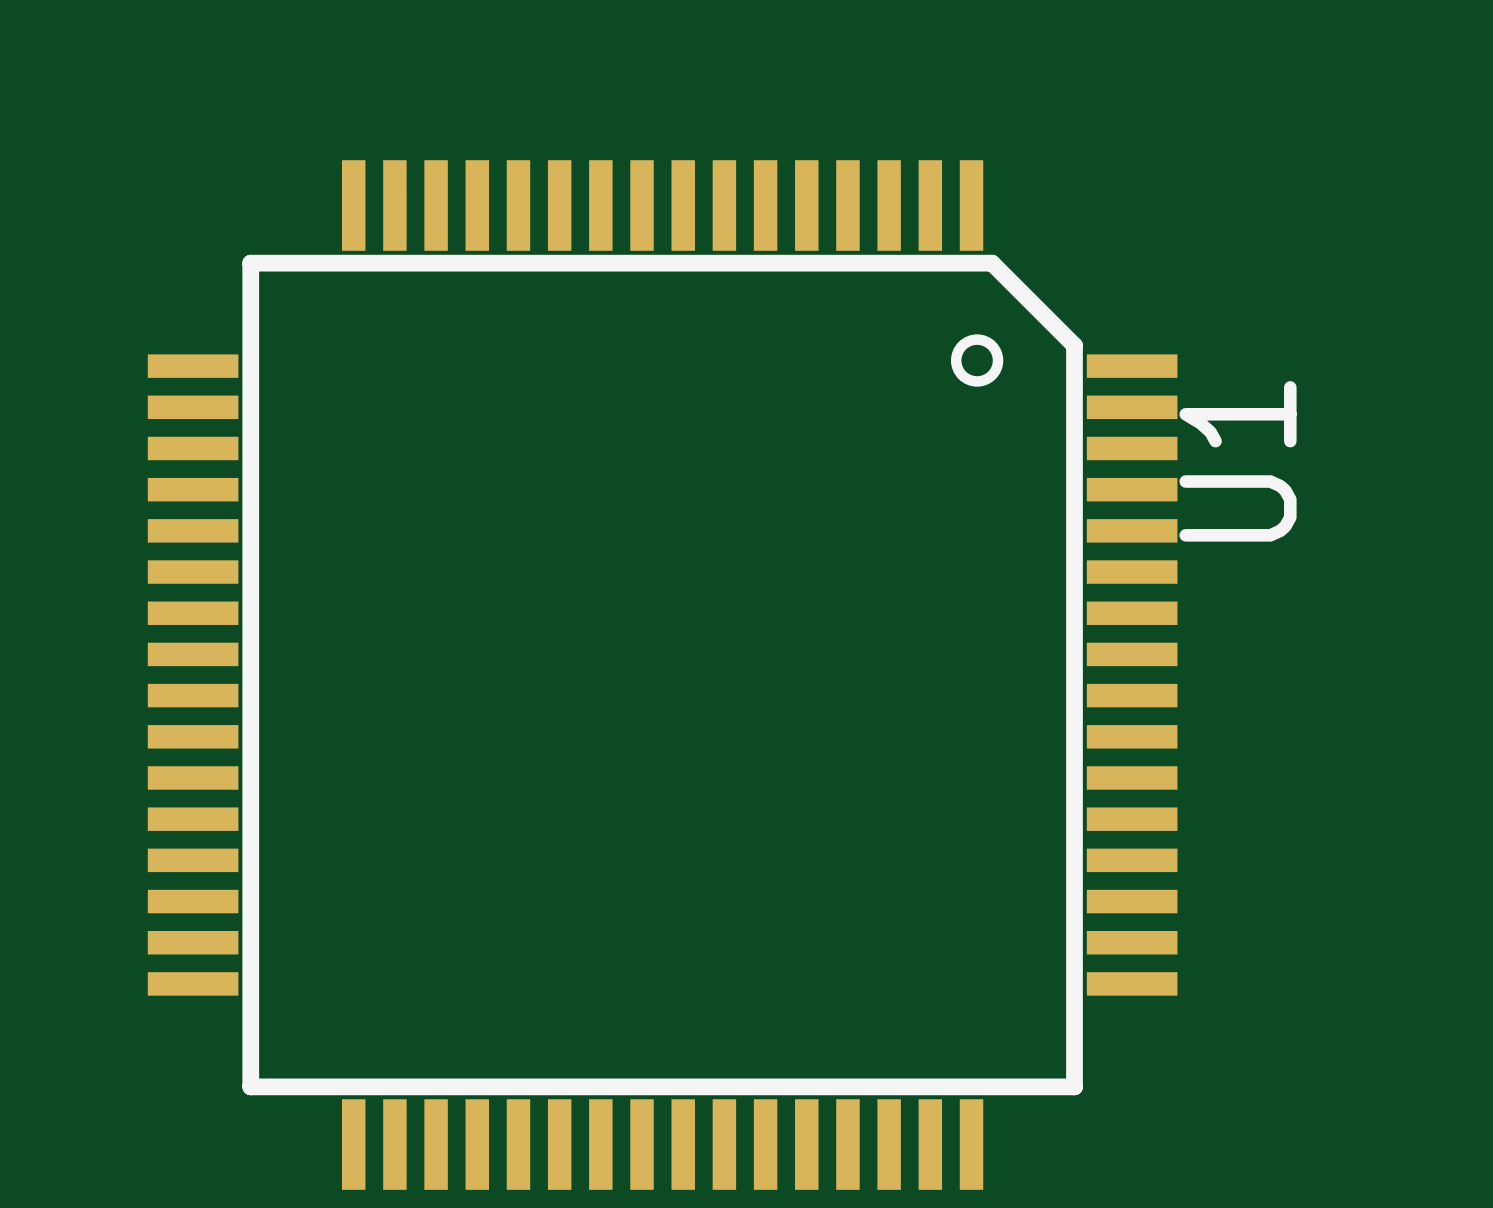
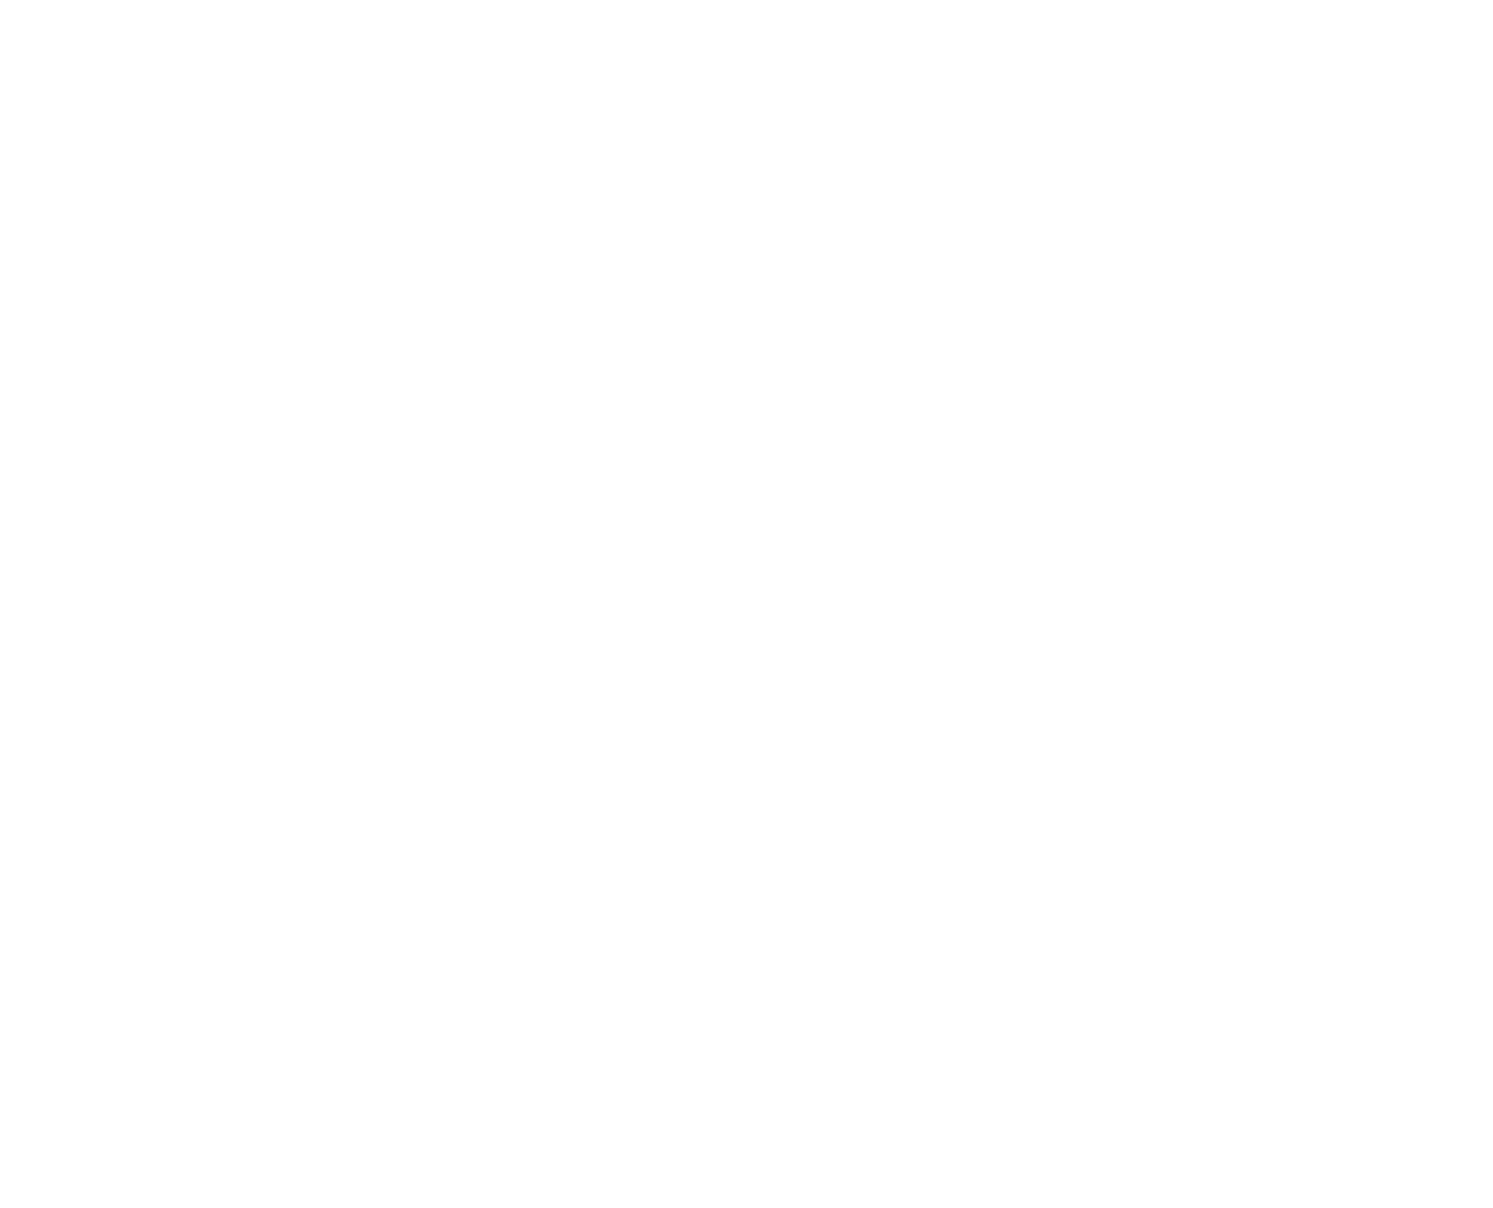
U1: (662, 675) -> none

